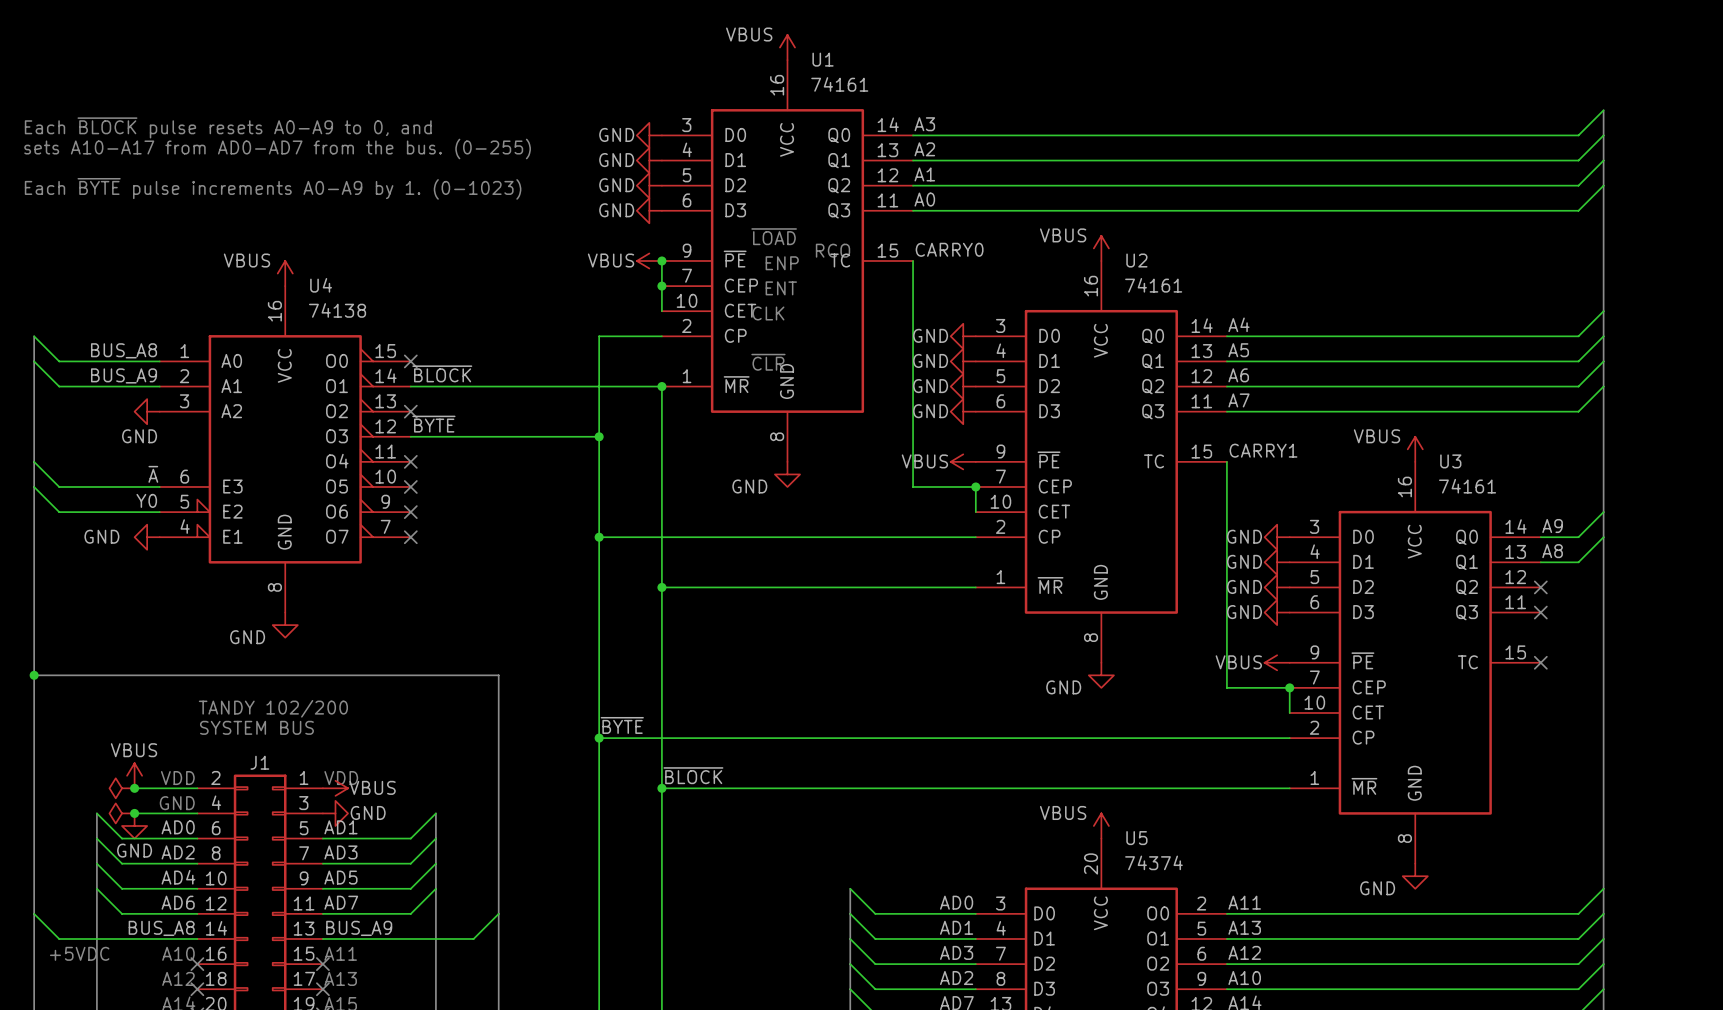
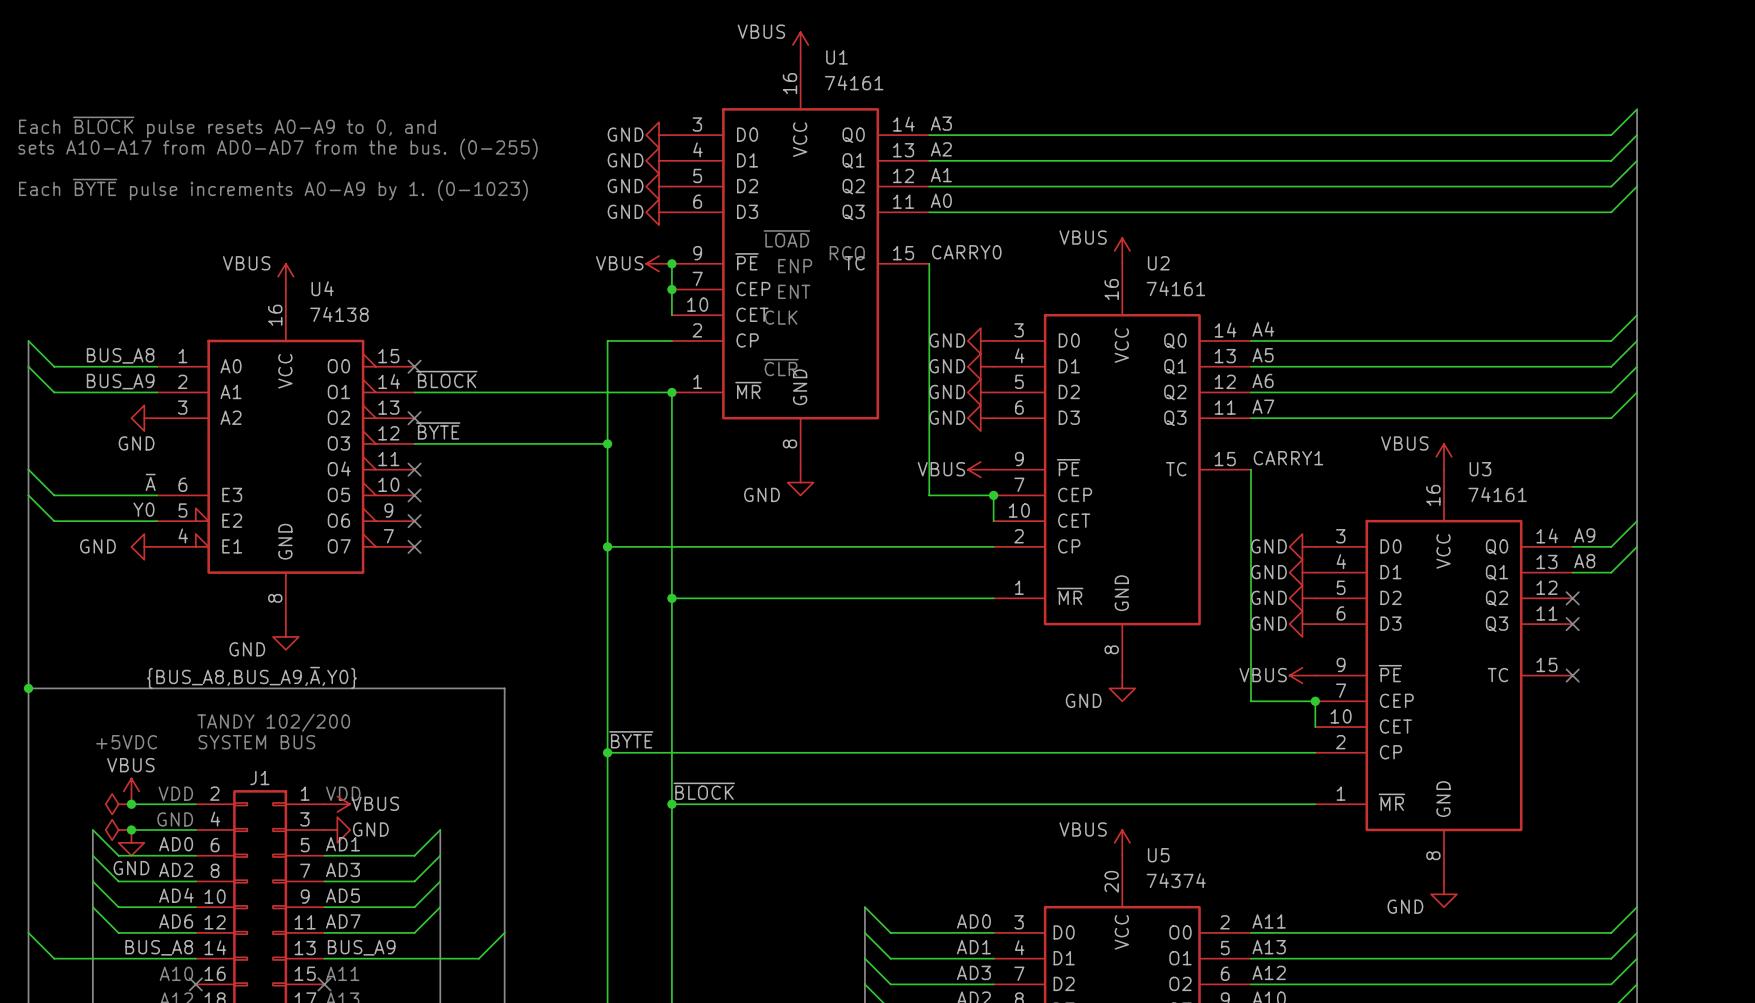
label: none -> {BUS_A8,BUS_A9,~{A},Y0} (251, 677)
text position: +5VDC (79, 953) -> +5VDC (126, 742)

